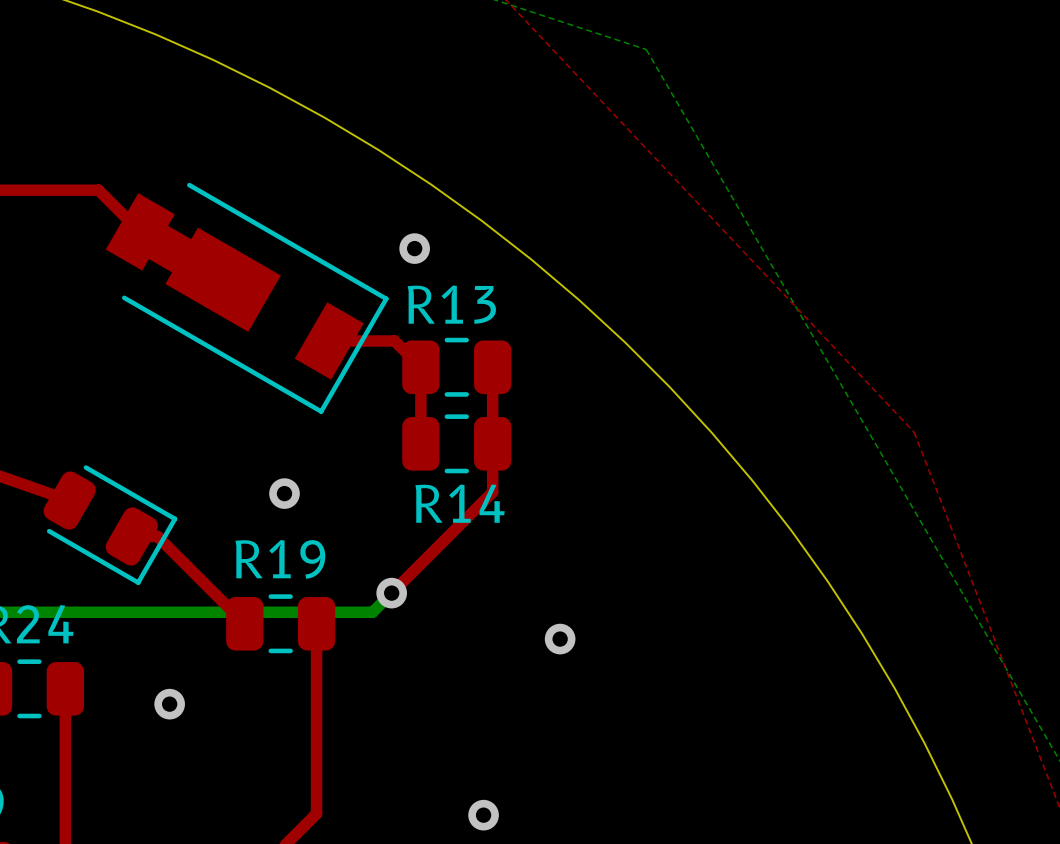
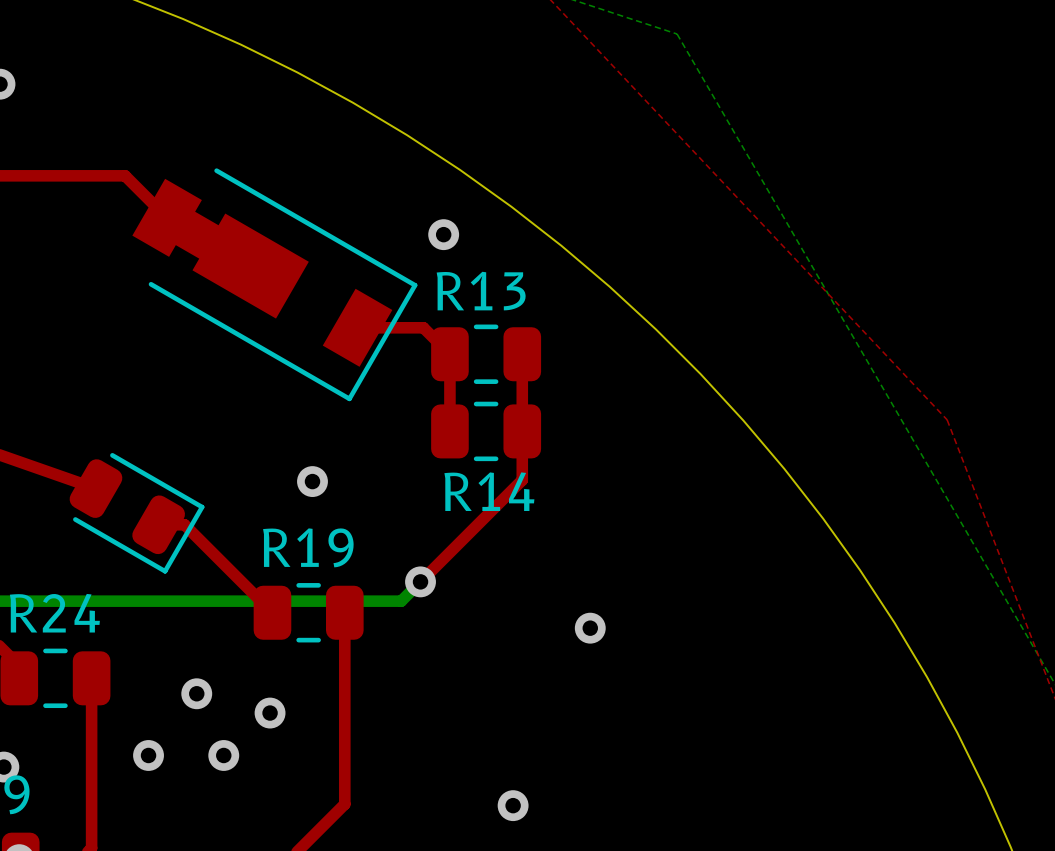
via: none -> (270, 713)
via: none -> (148, 755)
via: none -> (223, 755)

